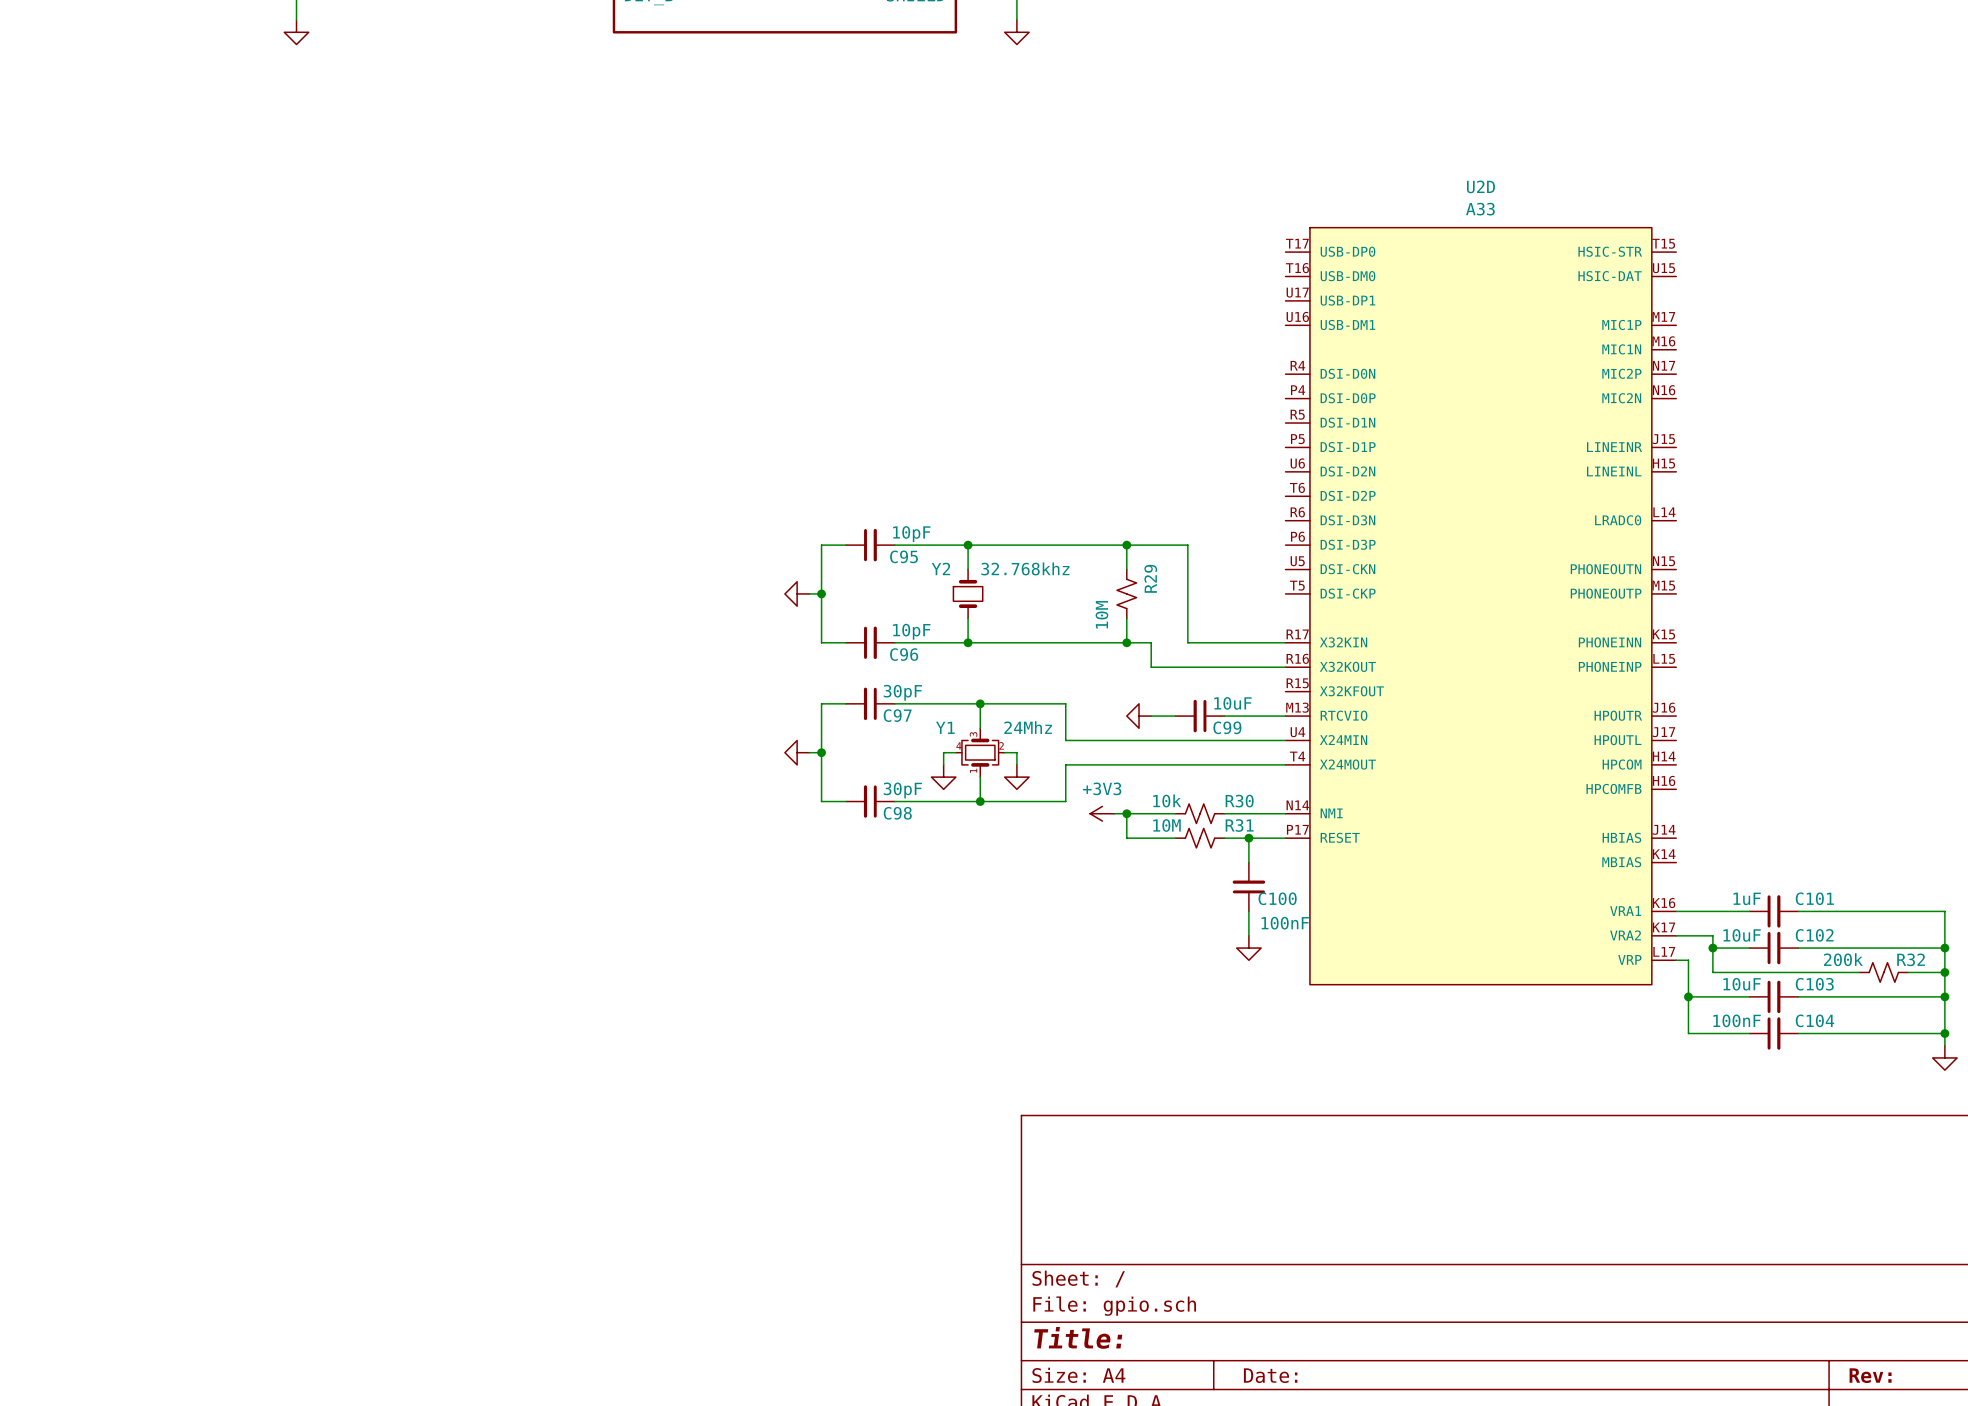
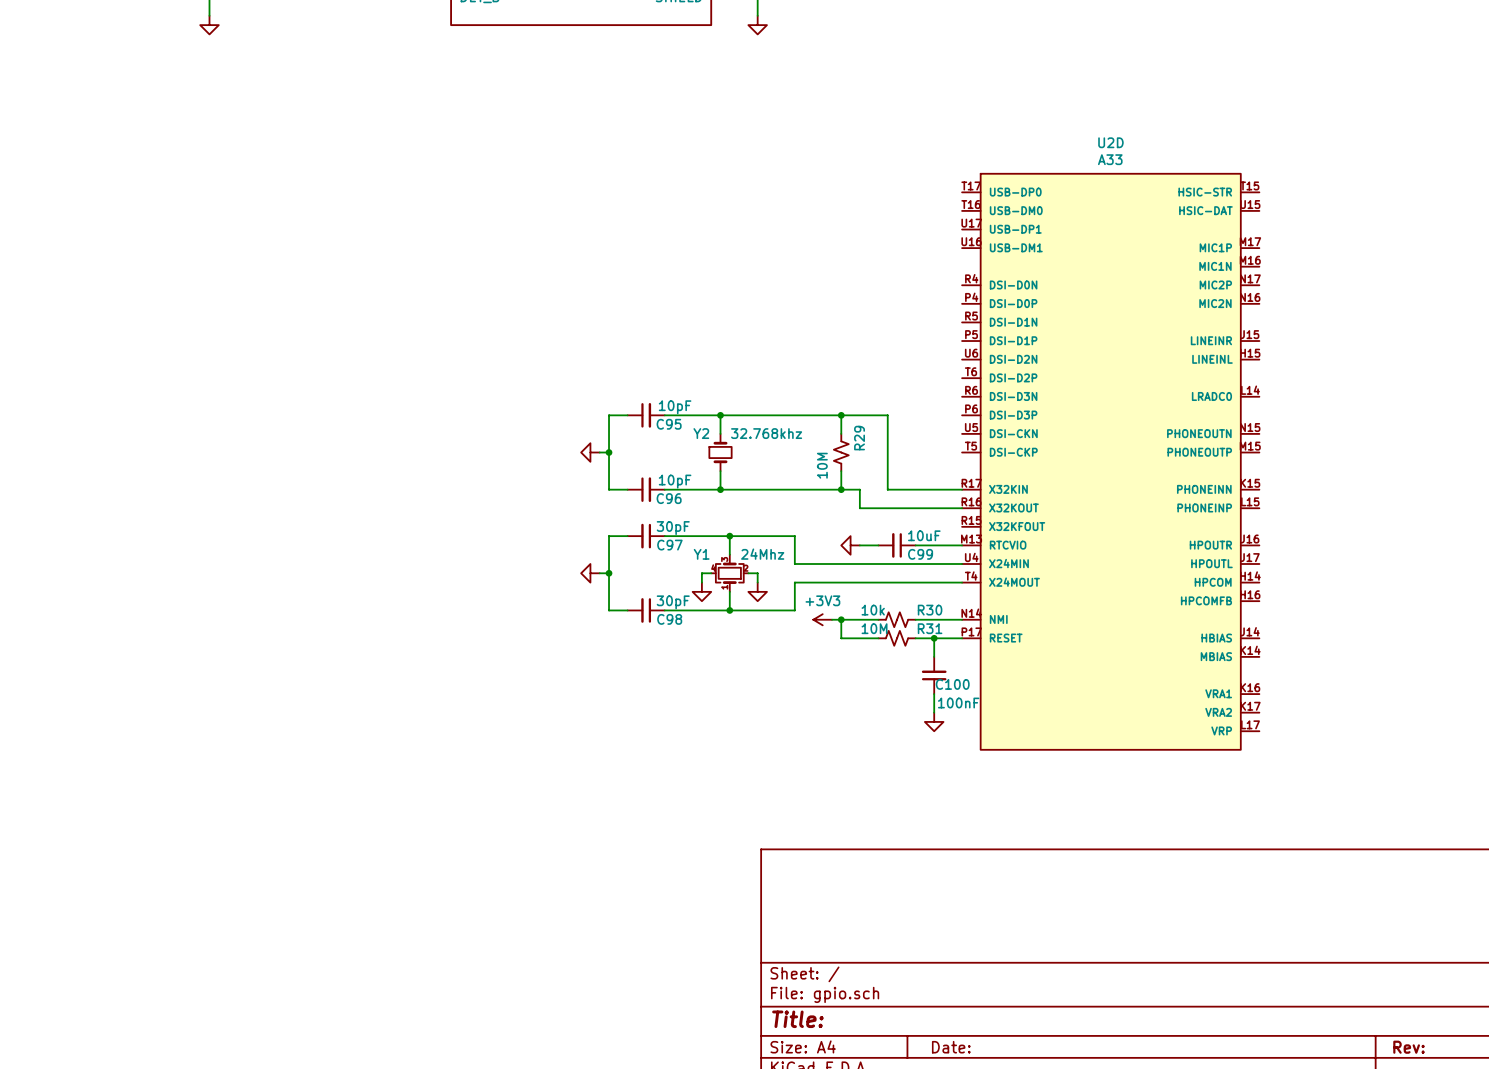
wire: (1676, 911) (1749, 911) -> none
C101: 1uF (1773, 911) -> none
wire: (1798, 911) (1944, 911) (1944, 1045) -> none
wire: (1676, 935) (1712, 935) (1712, 972) (1859, 972) -> none
wire: (1712, 948) (1749, 948) -> none
junction: (1712, 948) -> none
C102: 10uF (1773, 948) -> none
wire: (1798, 948) (1944, 948) -> none
junction: (1944, 948) -> none
wire: (1676, 960) (1688, 960) (1688, 1033) (1749, 1033) -> none
R32: 200k (1883, 972) -> none
wire: (1908, 972) (1944, 972) -> none
junction: (1944, 972) -> none
wire: (1688, 996) (1749, 996) -> none
junction: (1688, 996) -> none
C103: 10uF (1773, 996) -> none
wire: (1798, 996) (1944, 996) -> none
junction: (1944, 996) -> none
C104: 100nF (1773, 1033) -> none
wire: (1798, 1033) (1944, 1033) -> none
junction: (1944, 1033) -> none
power symbol: (1944, 1057) -> none

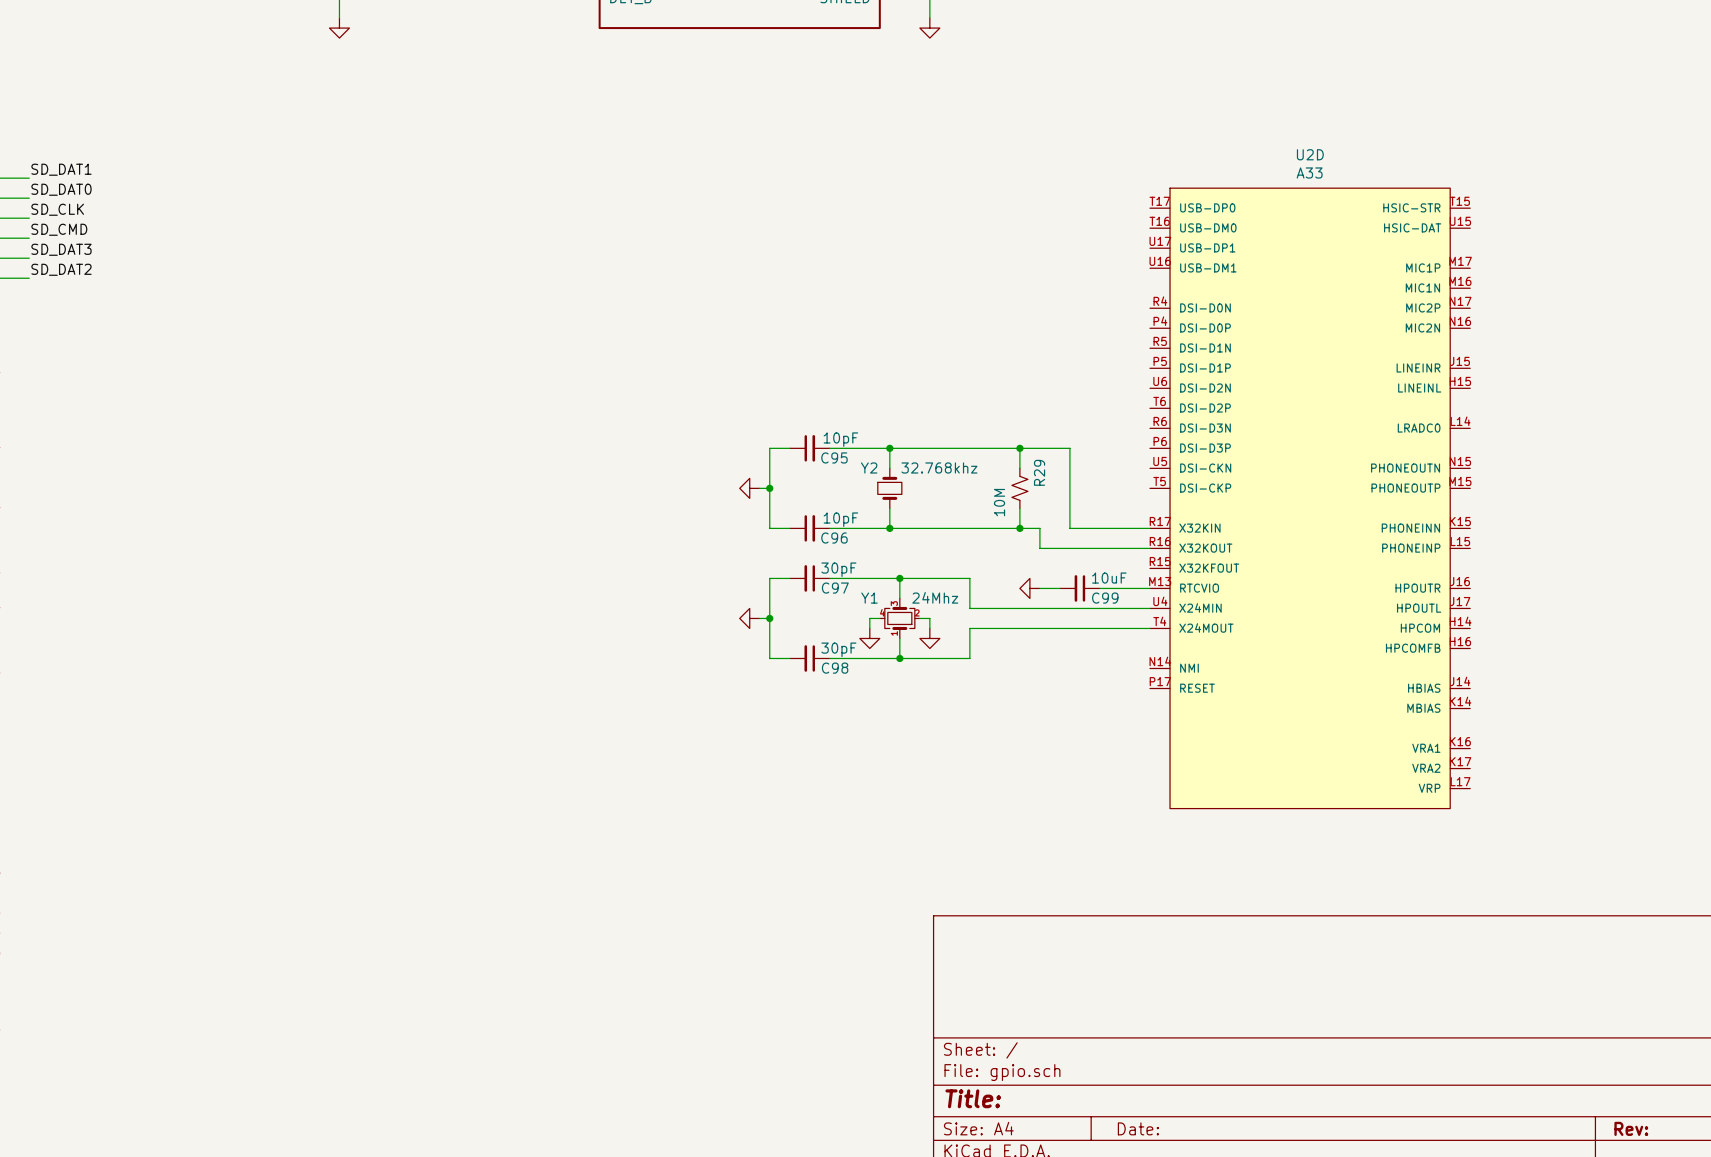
power symbol: +3V3 (822, 619) -> none
wire: (832, 619) (878, 619) -> none
wire: (841, 619) (841, 638) (878, 638) -> none
junction: (841, 619) -> none
R30: 10k (897, 619) -> none
wire: (915, 619) (962, 619) -> none
R31: 10M (897, 638) -> none
wire: (915, 638) (962, 638) -> none
wire: (934, 638) (934, 656) -> none
junction: (934, 638) -> none
C100: 100nF (934, 675) -> none
wire: (934, 694) (934, 712) -> none
power symbol: (934, 721) -> none

